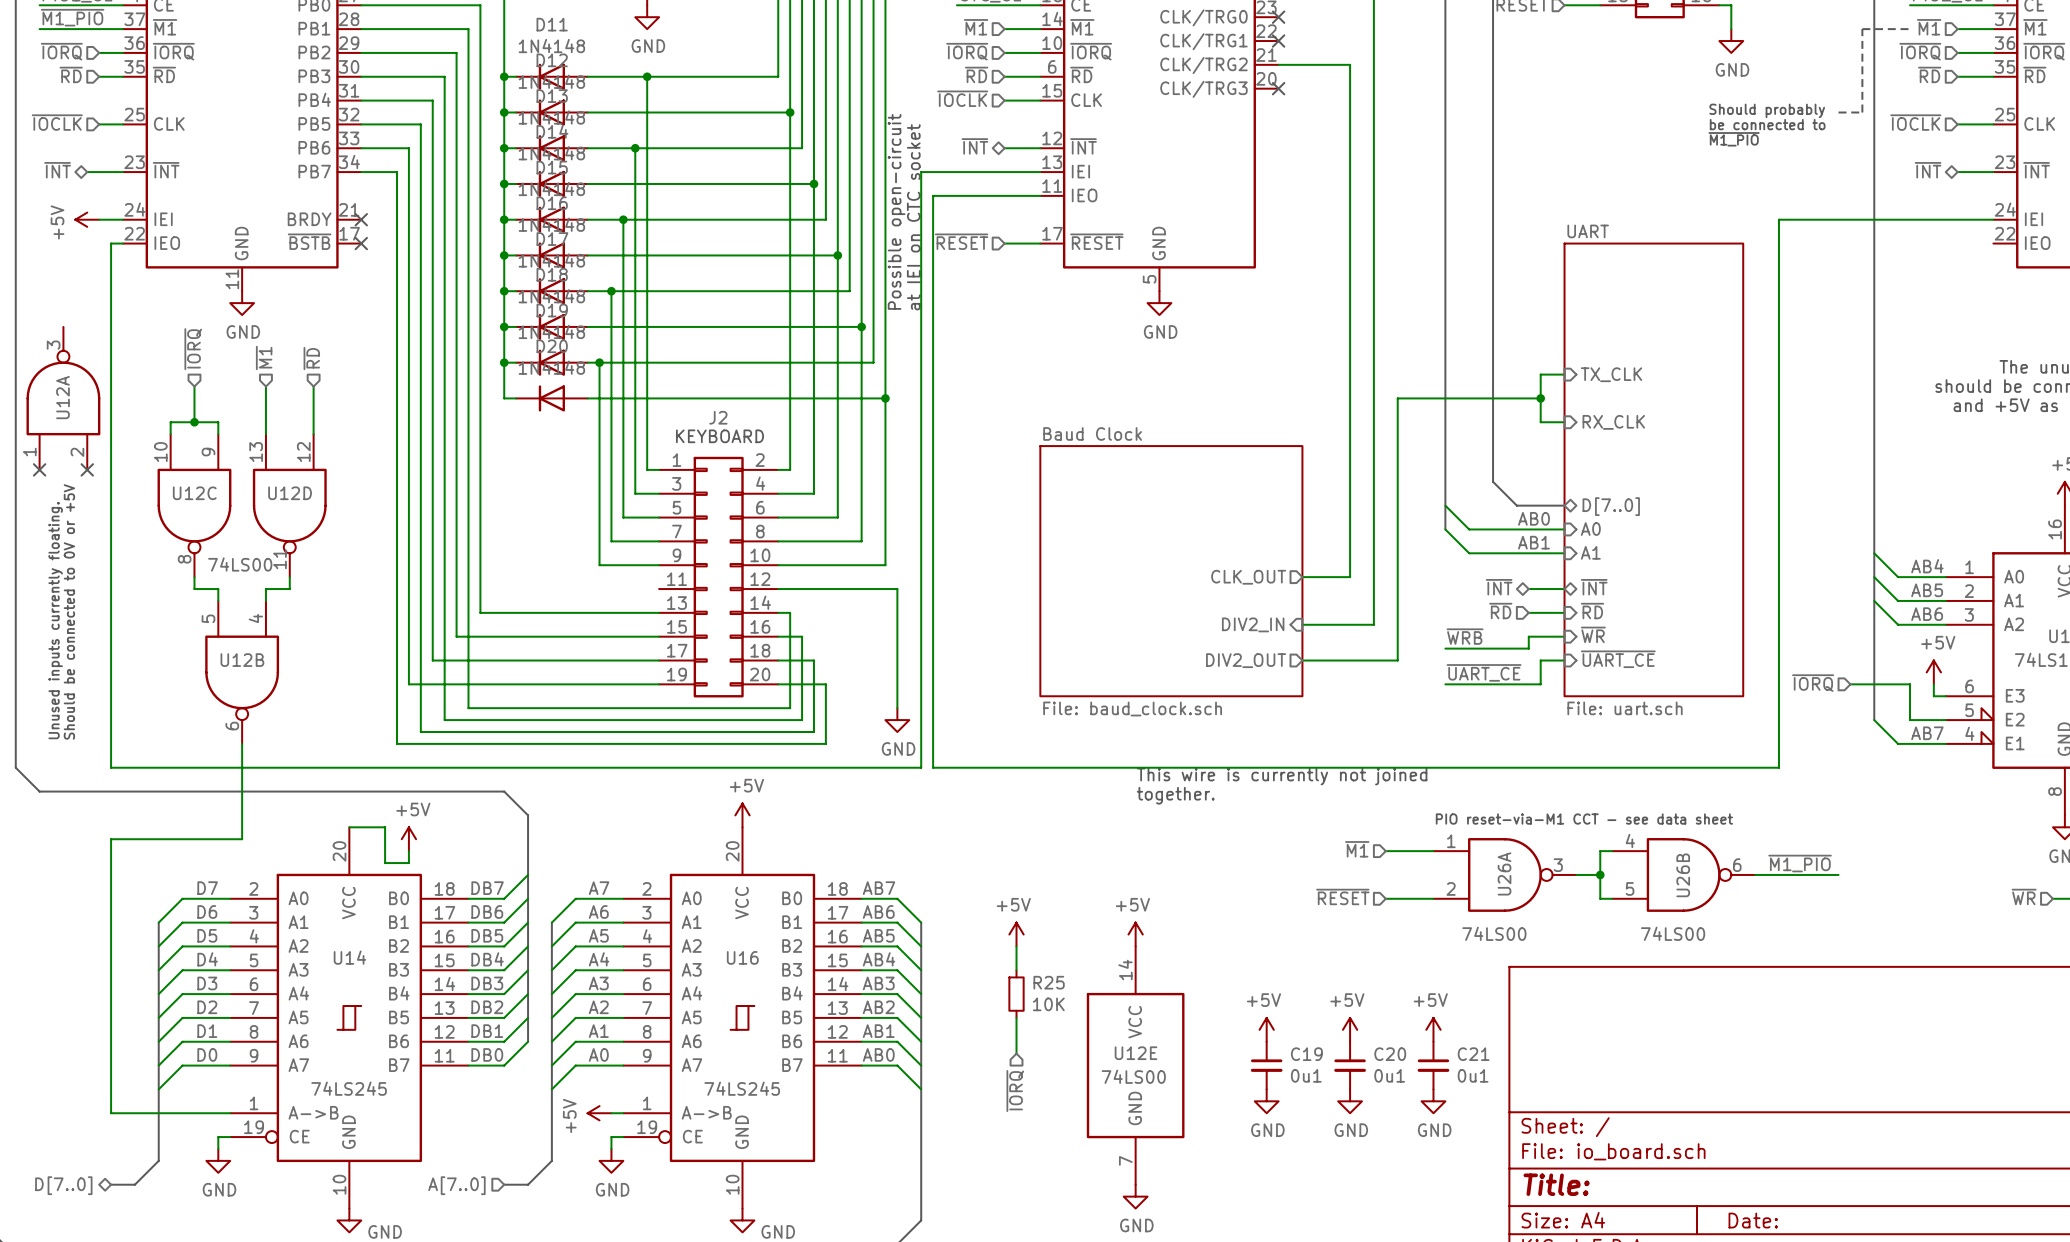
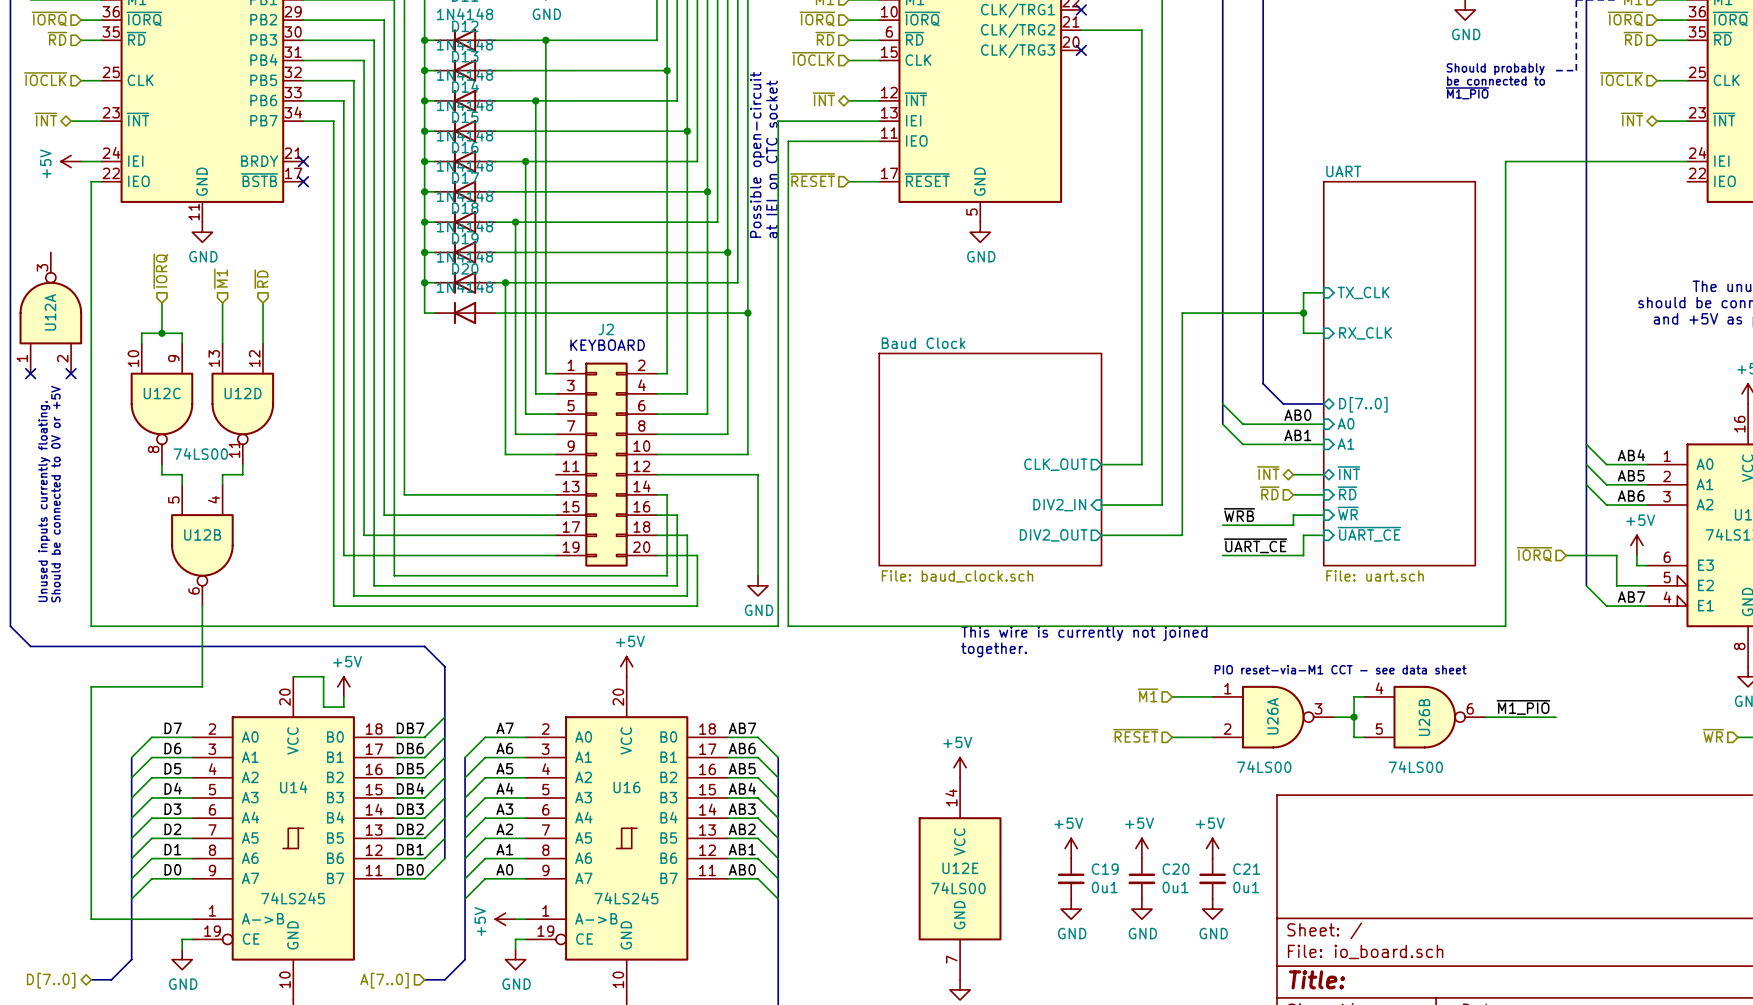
power symbol: +5V (1016, 934) -> none
wire: (1016, 946) (1016, 970) -> none
R25: 10K (1016, 994) -> none
wire: (1016, 1017) (1016, 1053) -> none
hierarchical label: ~{IORQ} (1015, 1091) -> none

